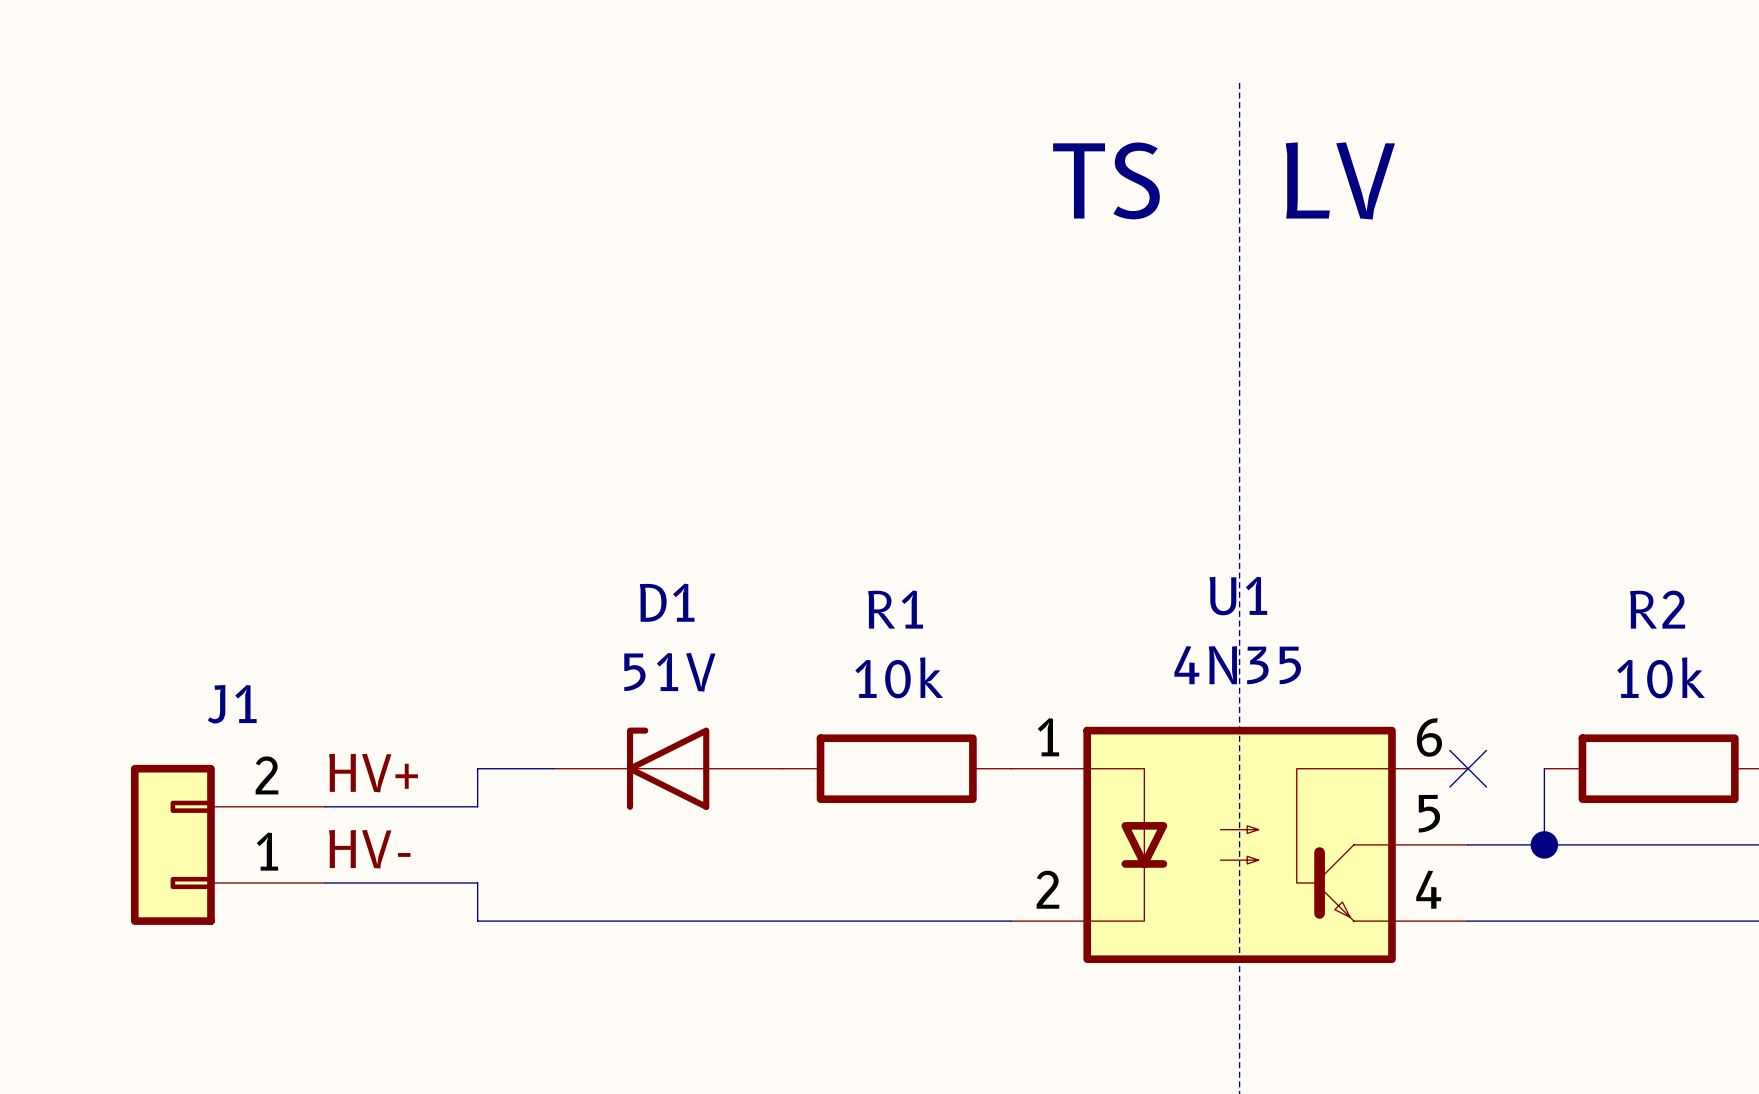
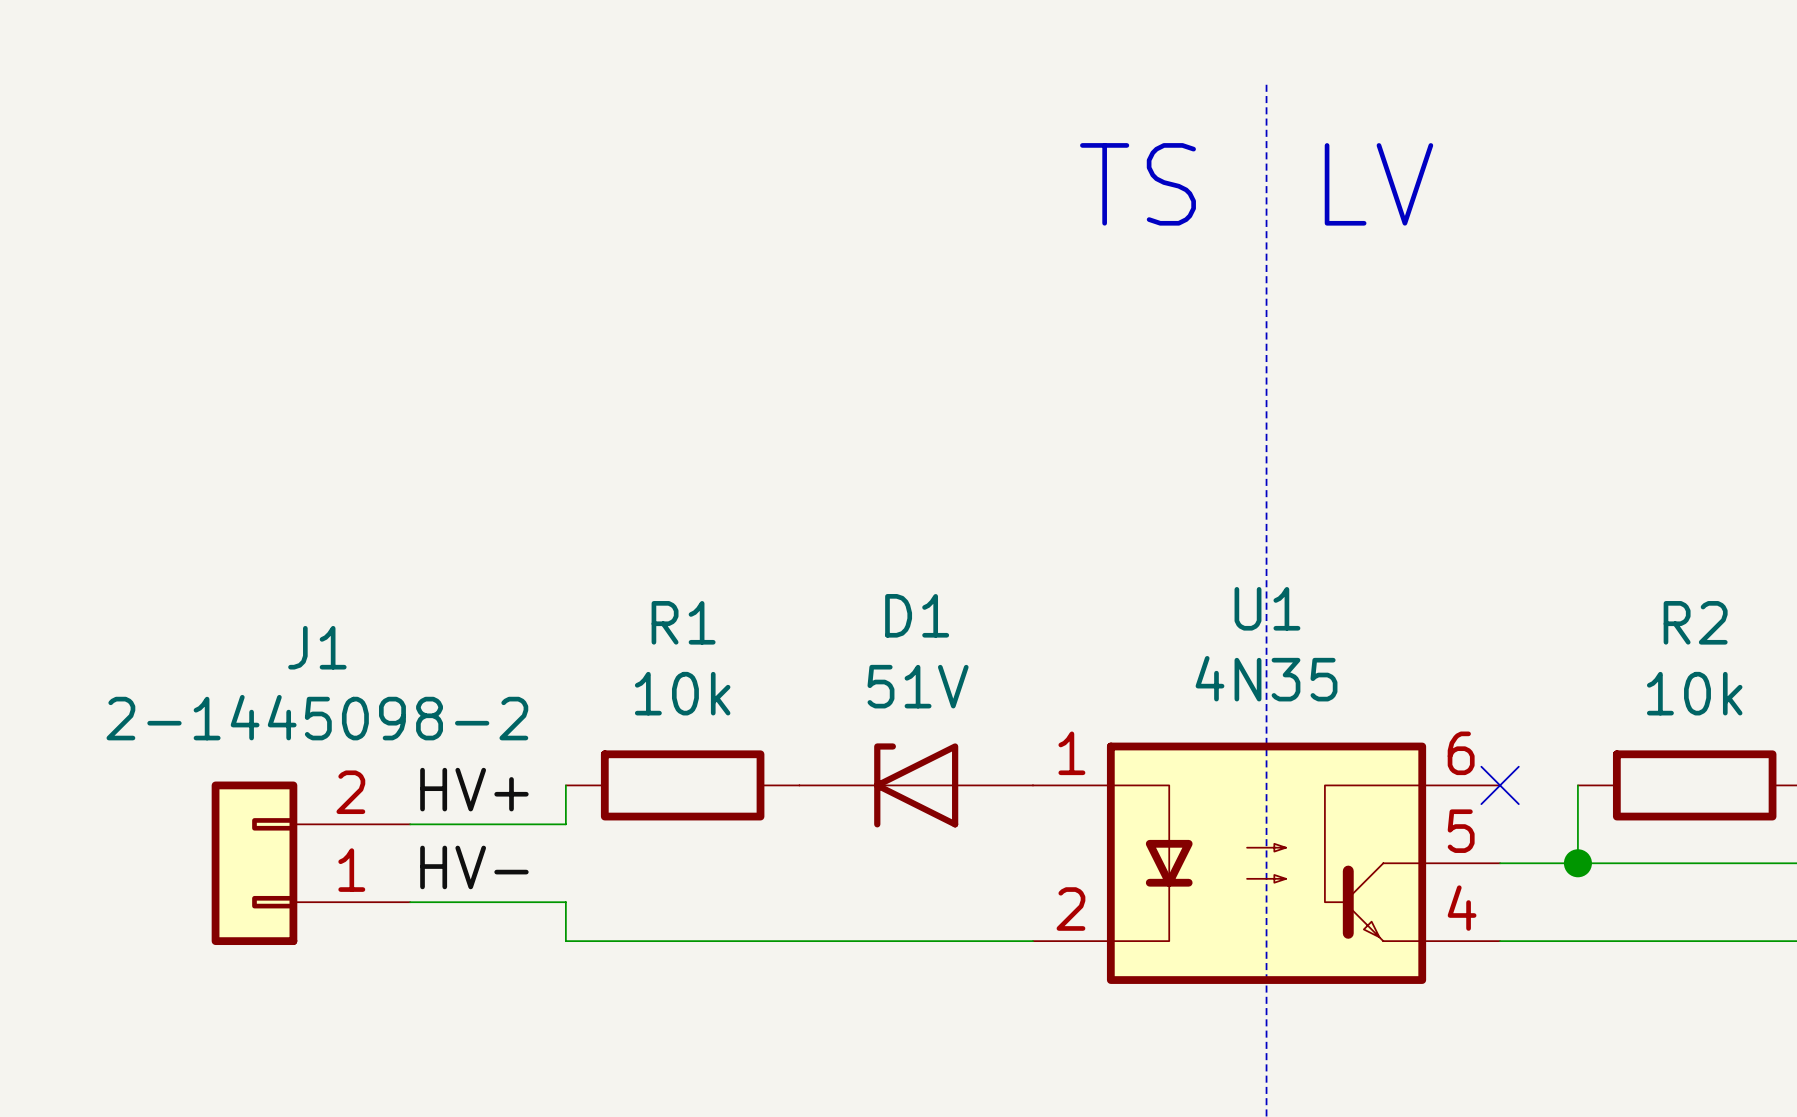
J1 value: none -> 2-1445098-2 (317, 717)
J1 name position: J1 (232, 704) -> J1 (317, 647)
wire: (553, 768) (477, 768) (477, 806) -> (565, 785) (565, 824) (488, 824)
D1 position: (668, 768) -> (916, 785)
R1 position: (896, 768) -> (682, 785)
label position: HV+ (373, 773) -> HV+ (474, 789)
J1 position: (228, 844) -> (310, 863)
label position: HV- (369, 849) -> HV- (474, 867)
wire: (477, 883) (477, 921) (553, 921) -> (488, 902) (565, 902) (565, 941)

